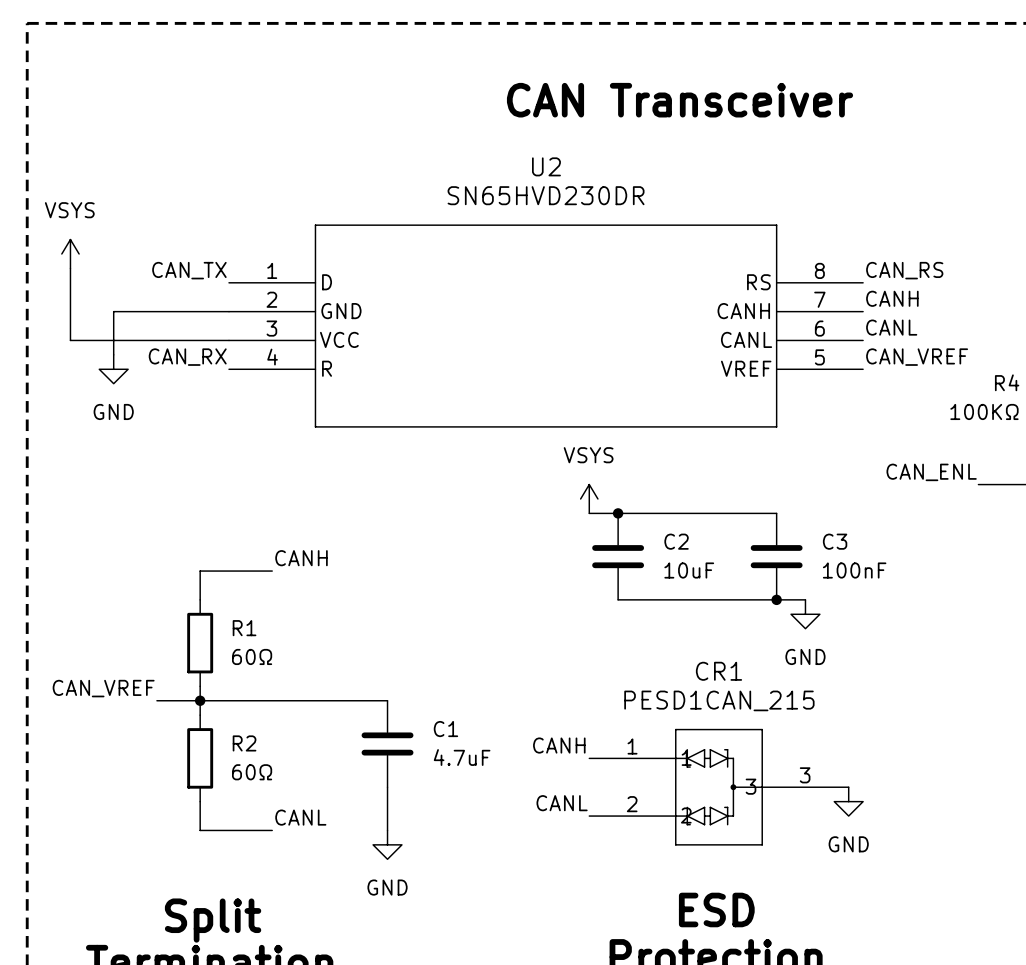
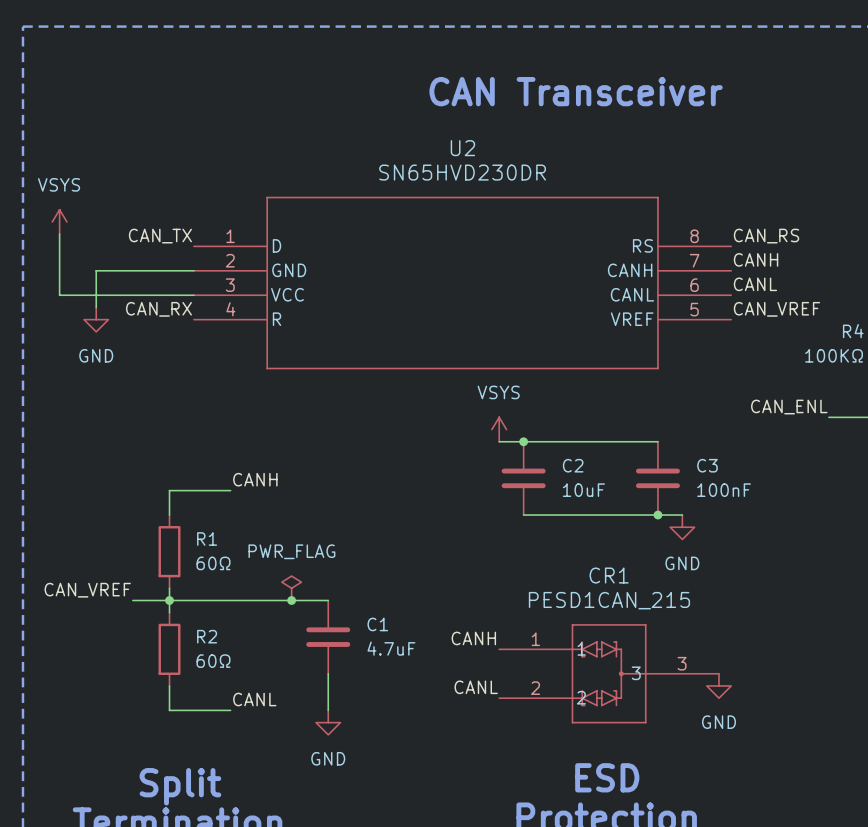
power symbol: none -> PWR_FLAG (291, 588)
junction: none -> (291, 600)

